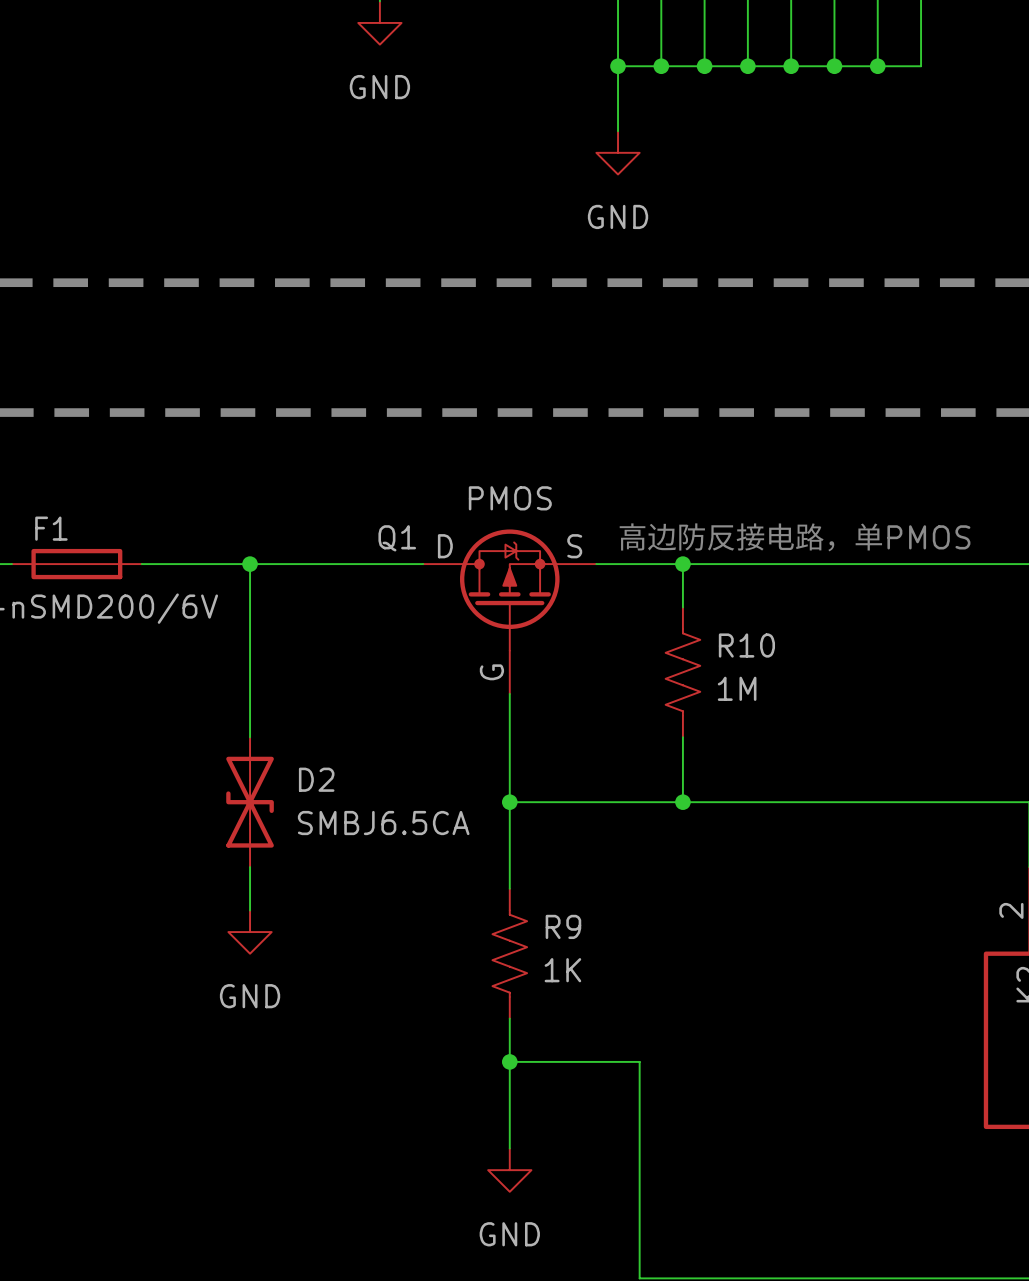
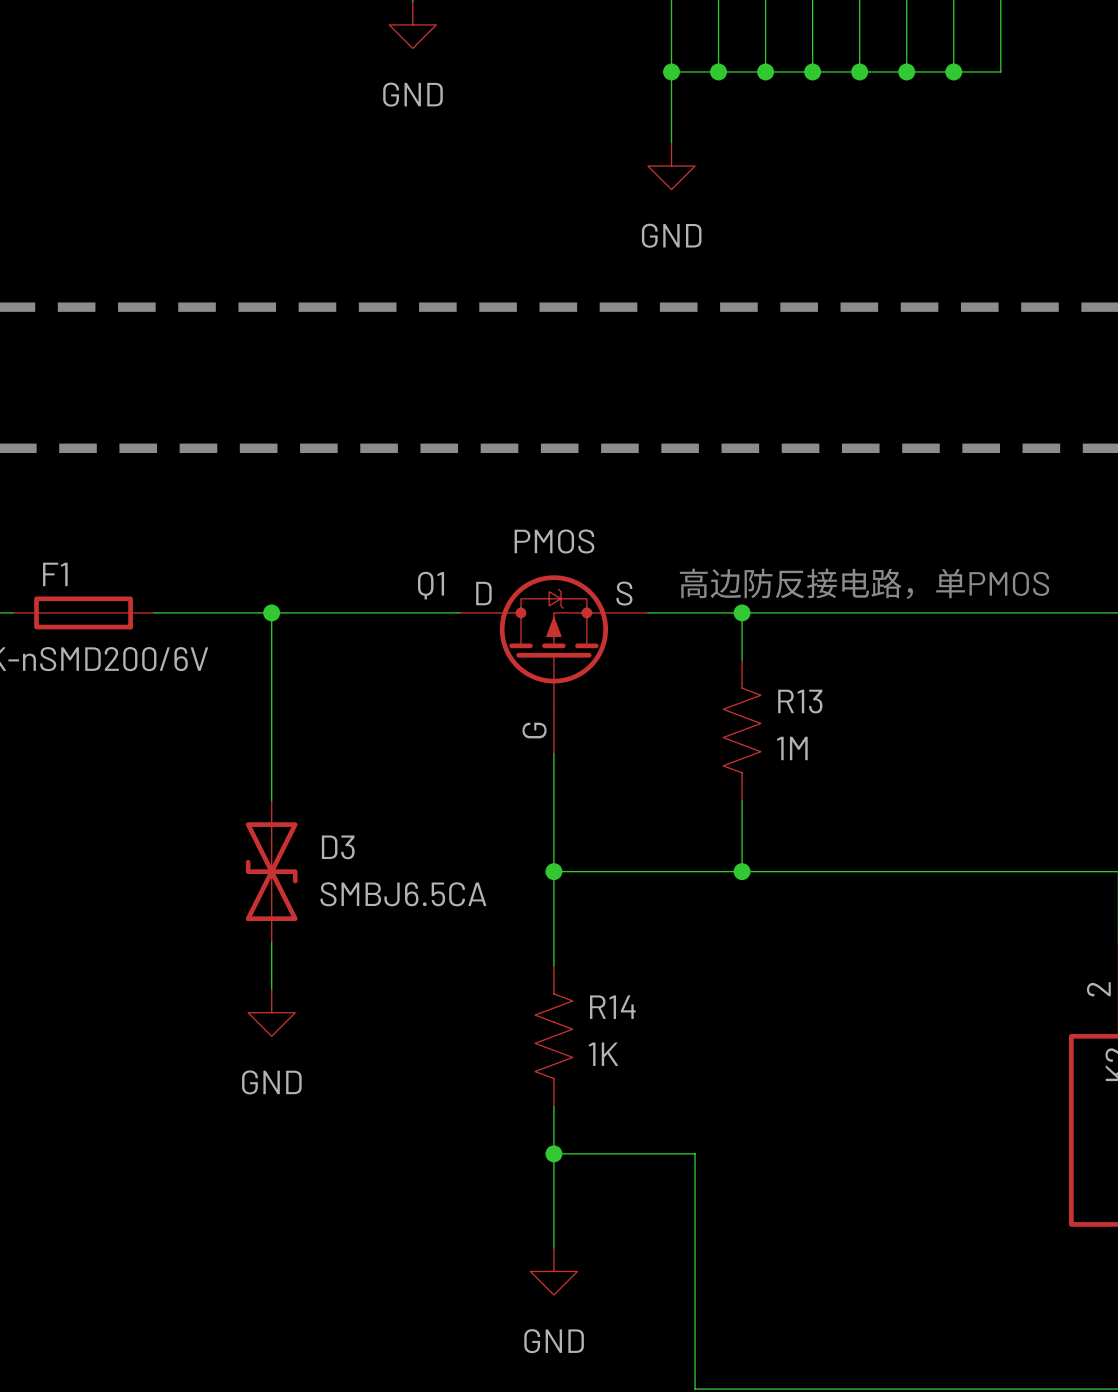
R10 name: R10 (746, 645) -> R13 (800, 701)
D2 name: D2 (316, 779) -> D3 (338, 847)
R9 name: R9 (563, 926) -> R14 (612, 1007)

